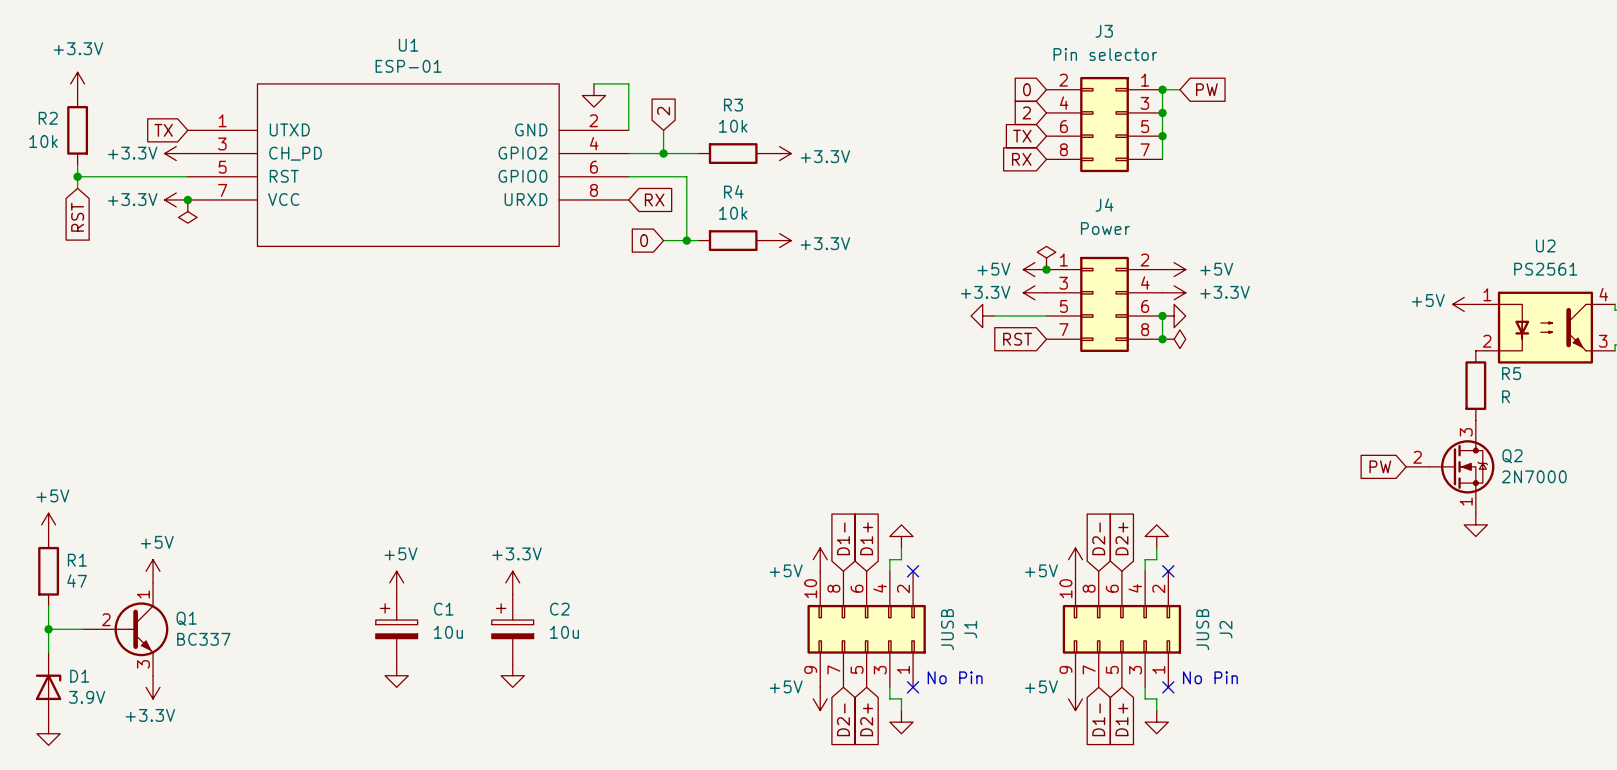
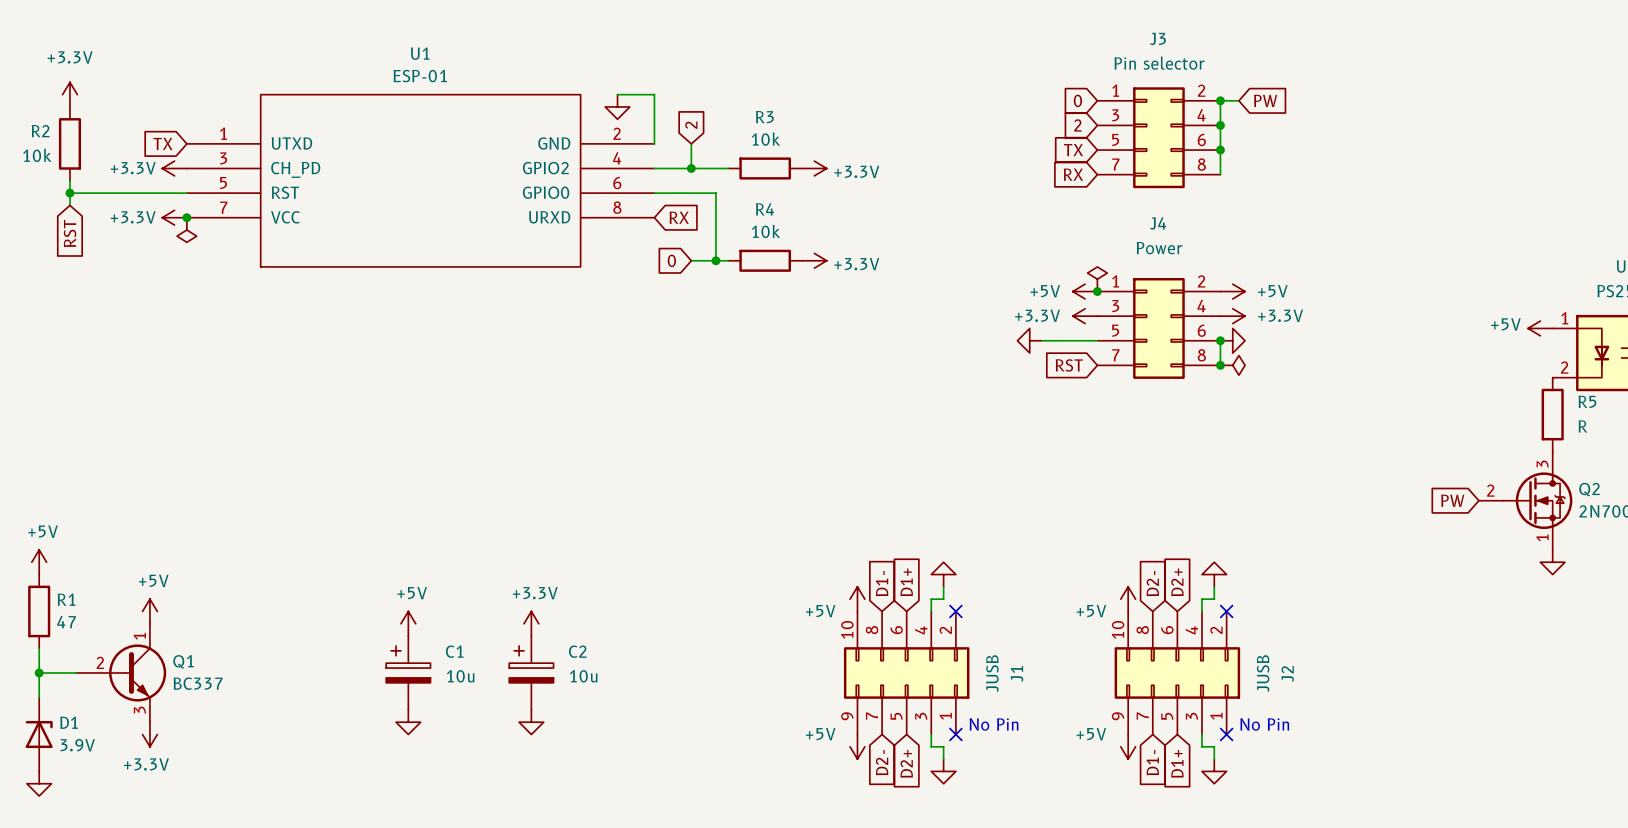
J3 flip: as is (1104, 124) -> left-right (1158, 137)

